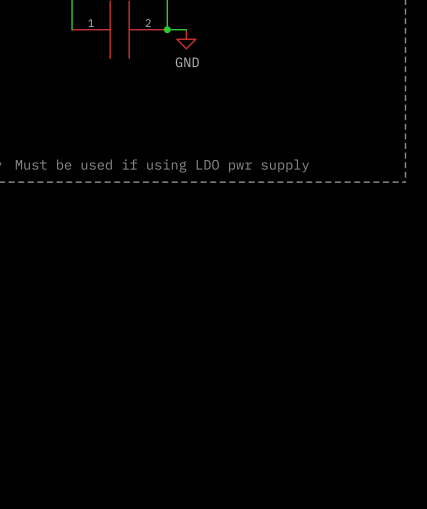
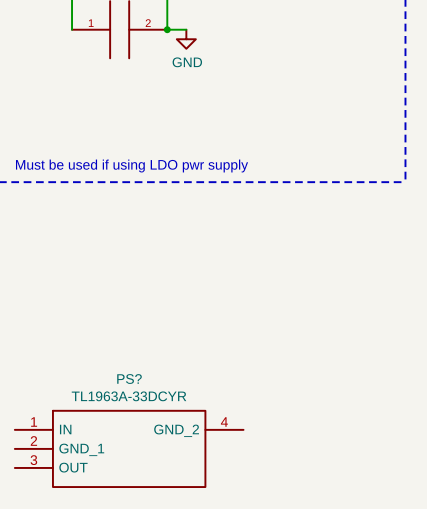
PS?: none -> TL1963A-33DCYR (129, 448)

